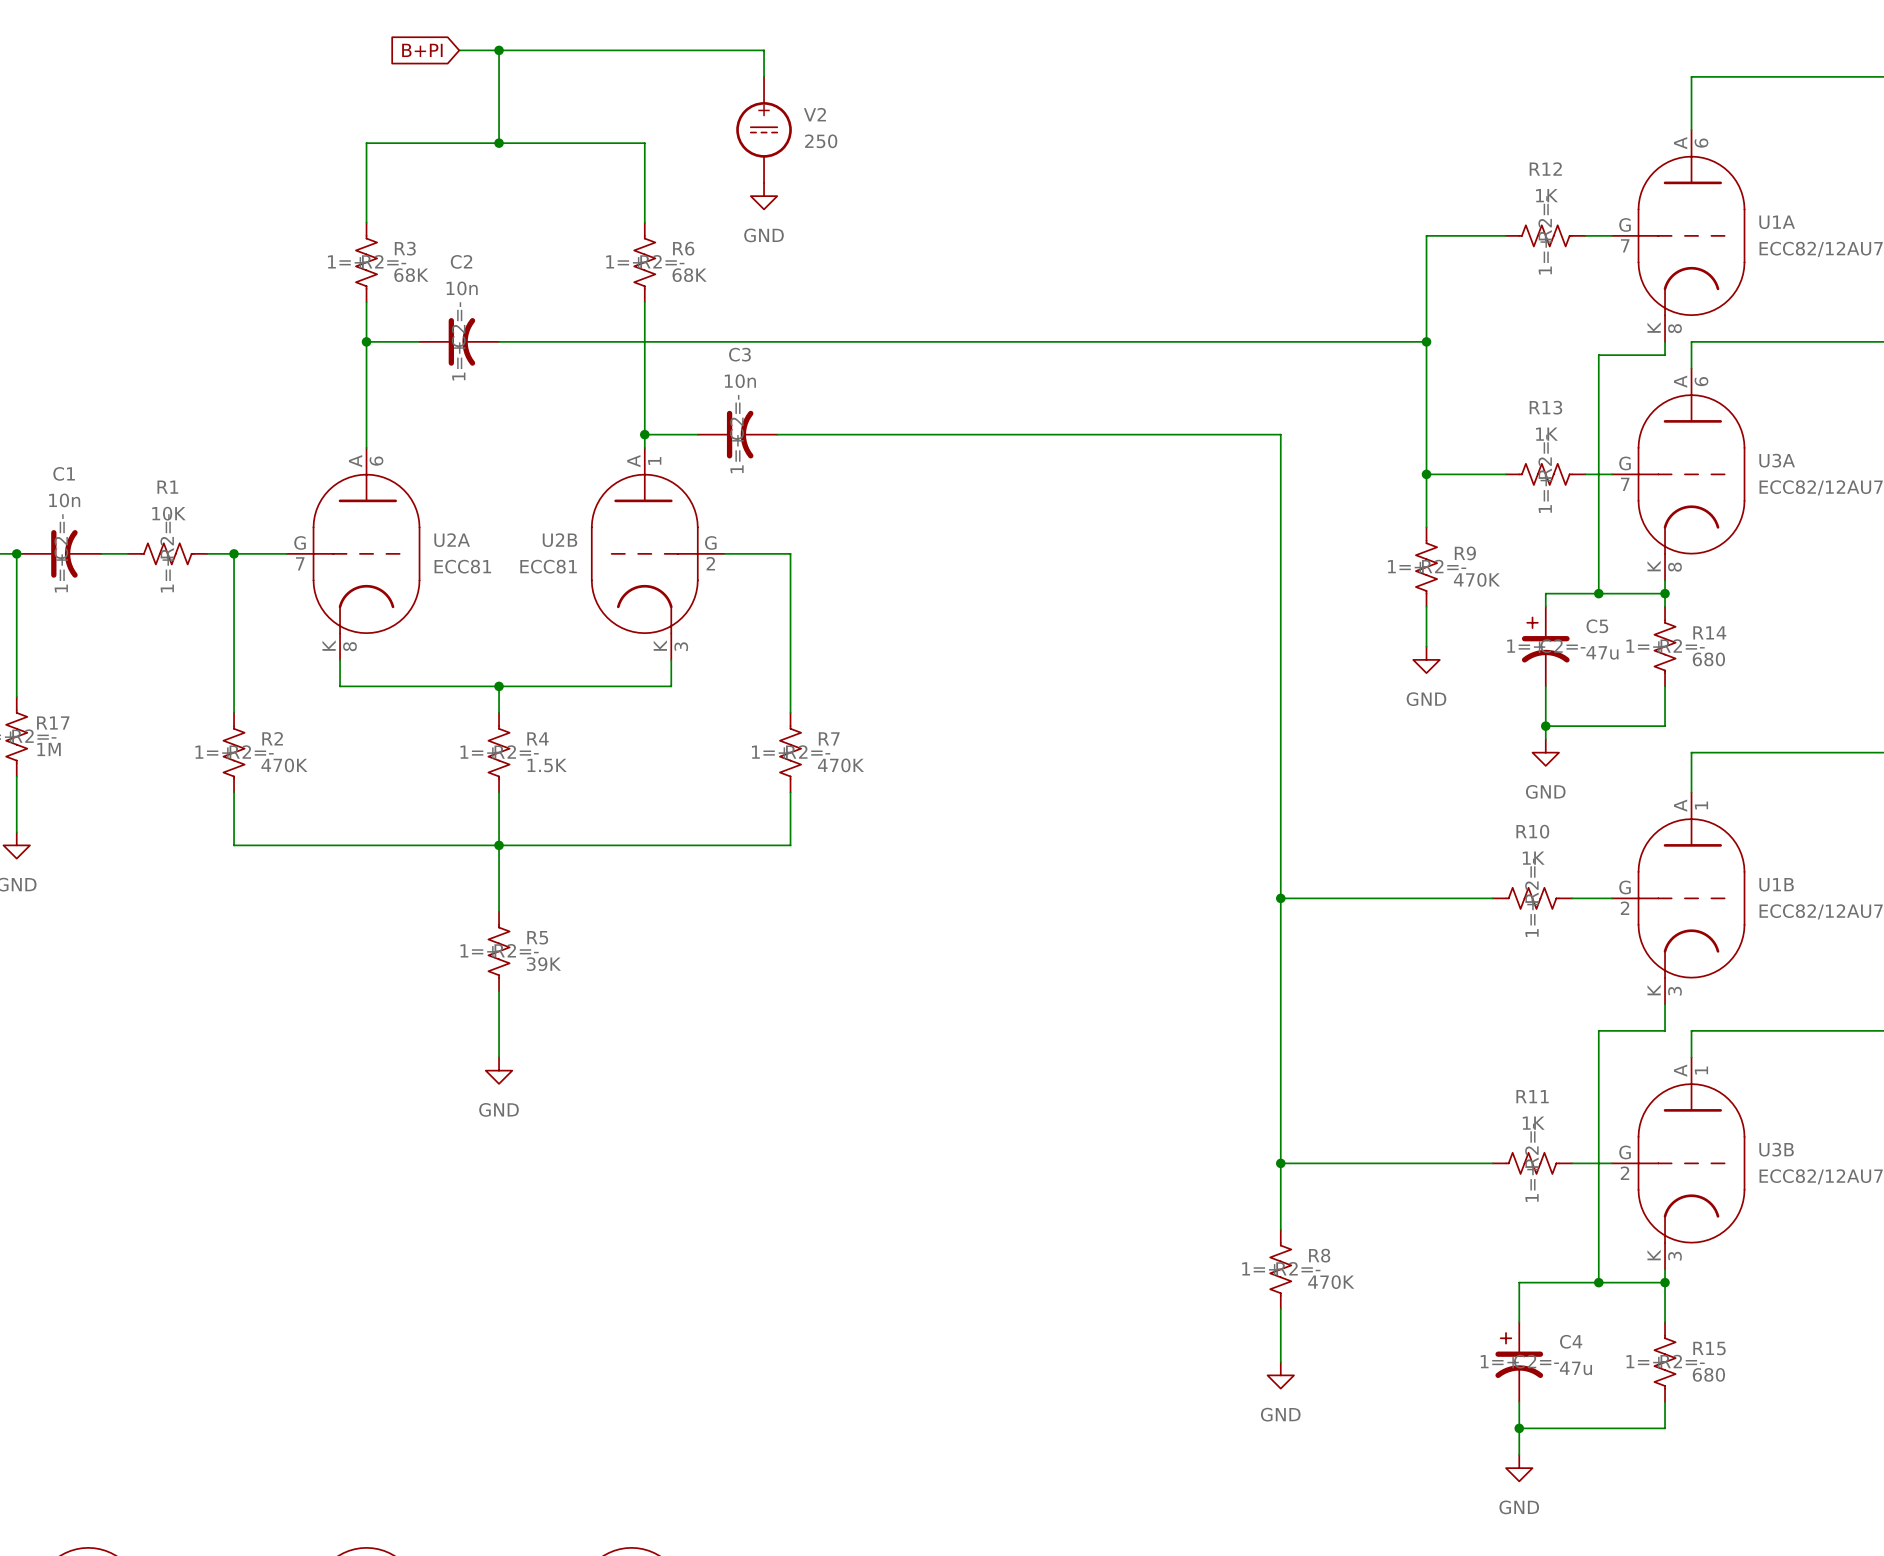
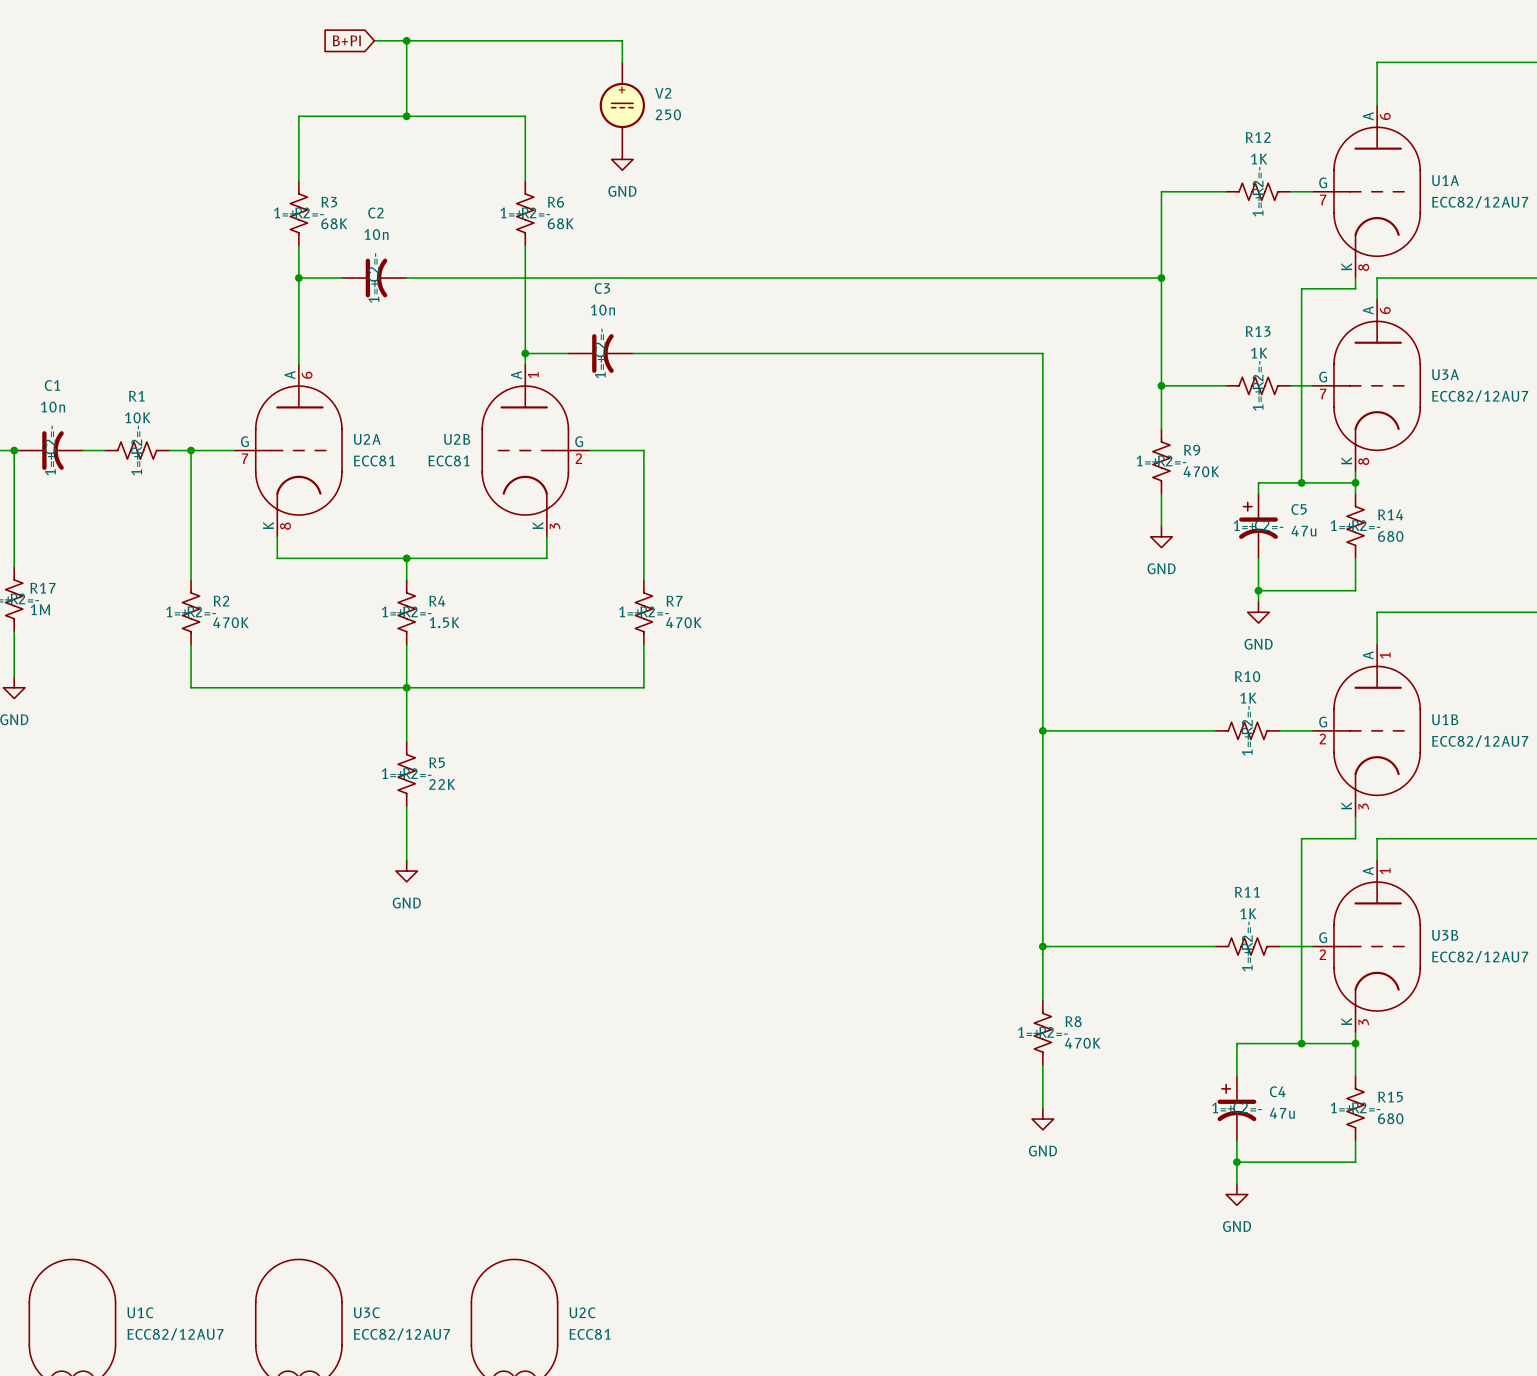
R5 value: 39K (543, 964) -> 22K (442, 784)

